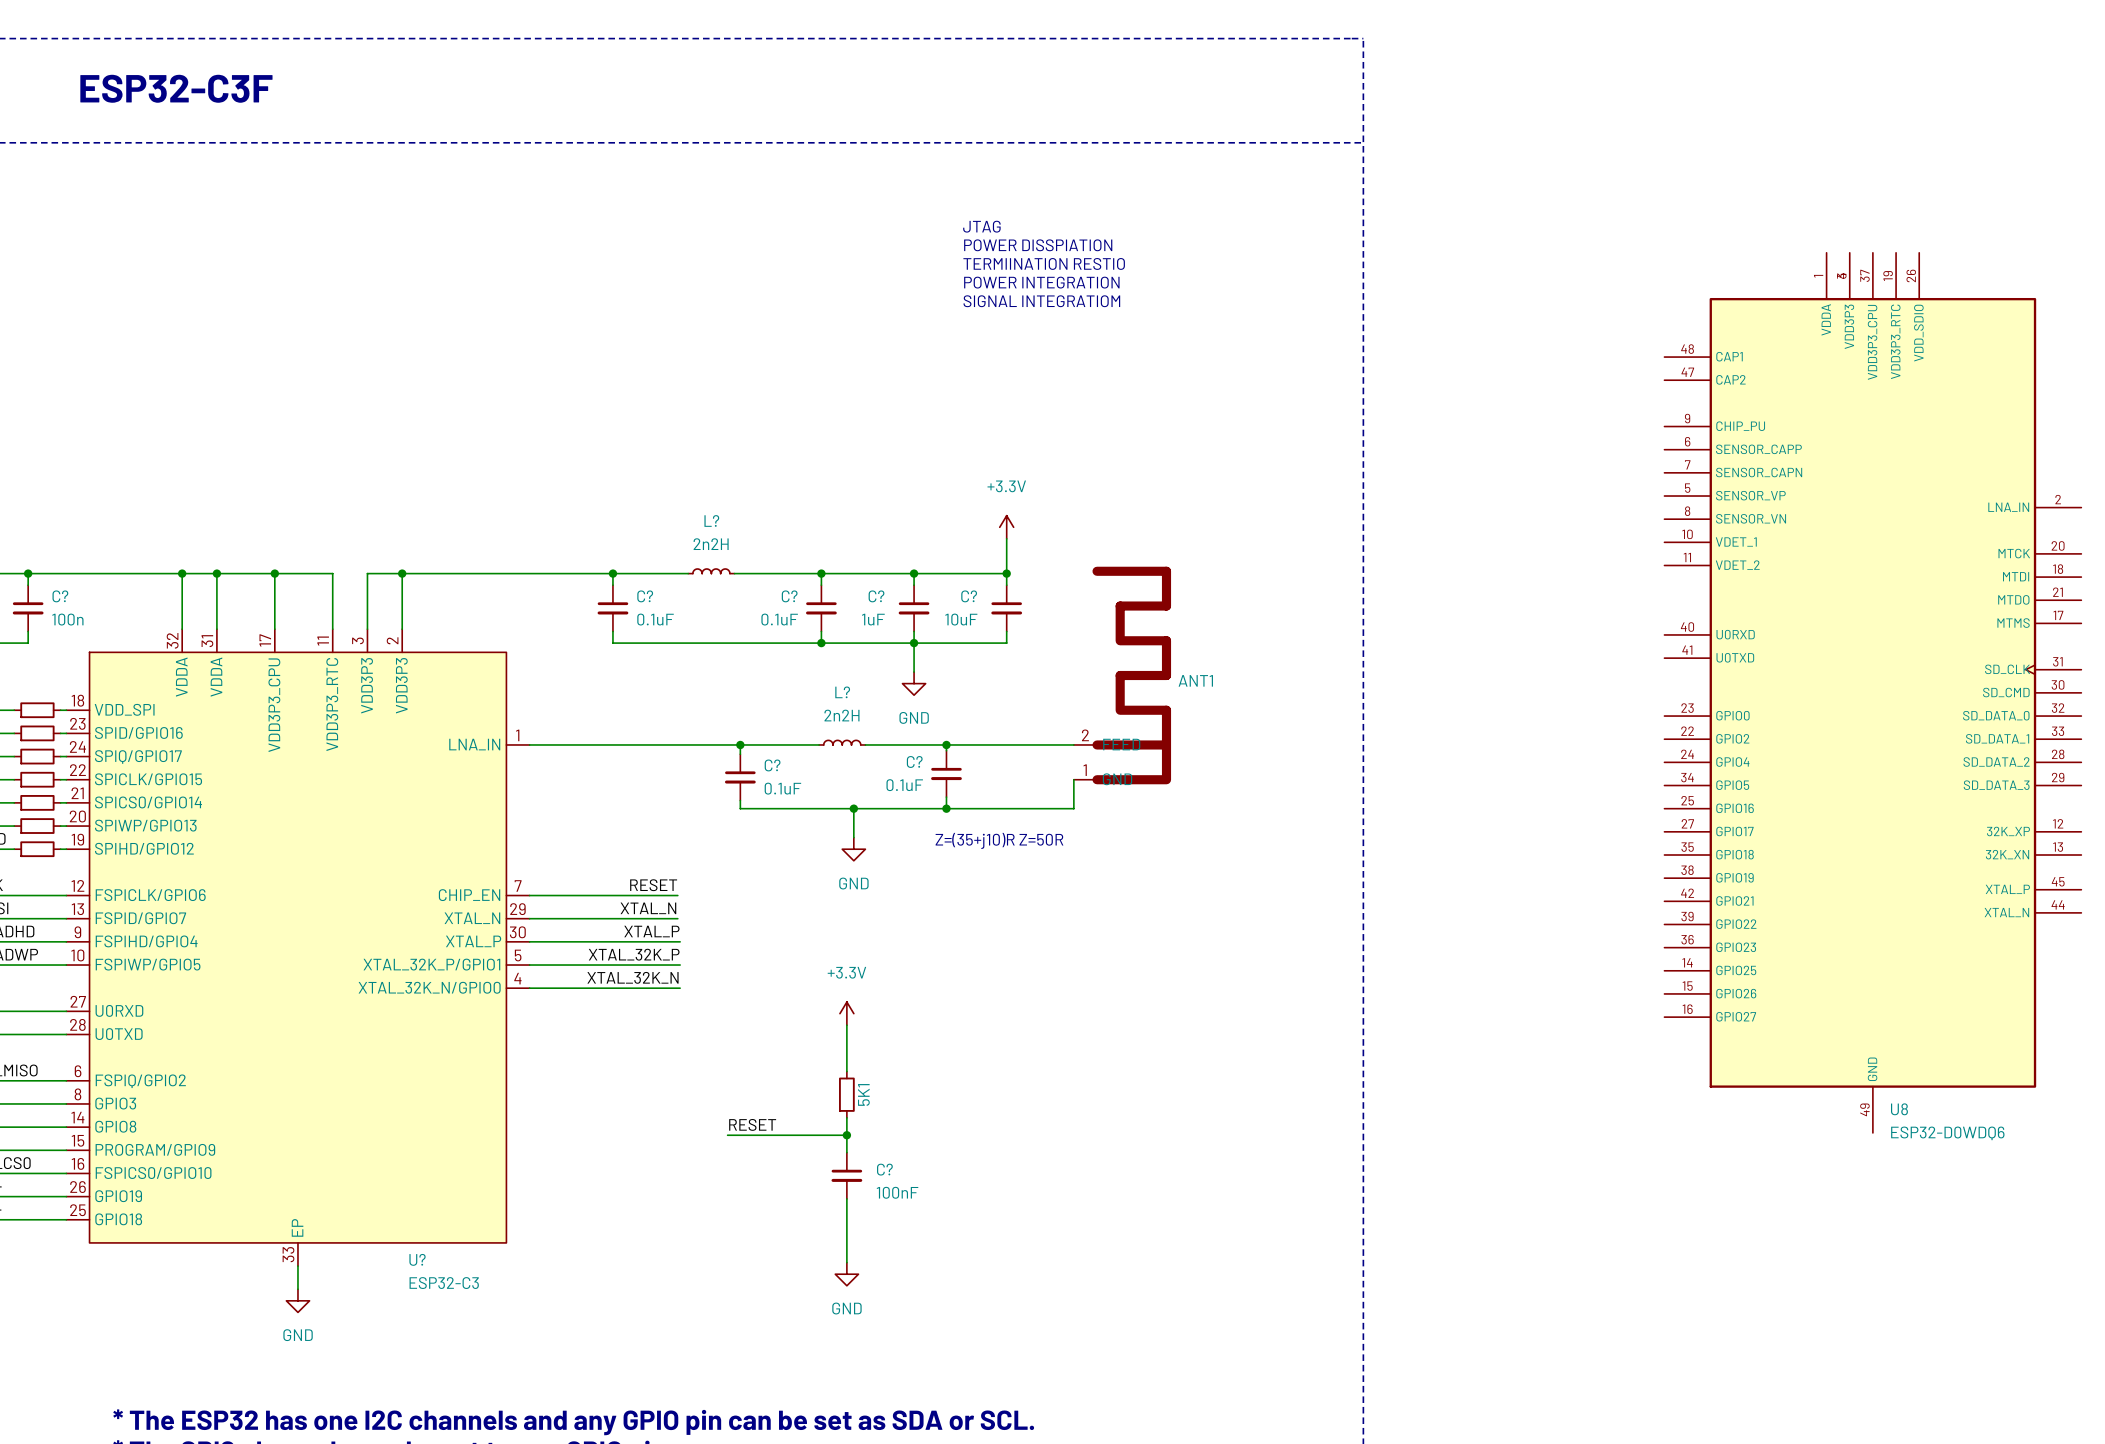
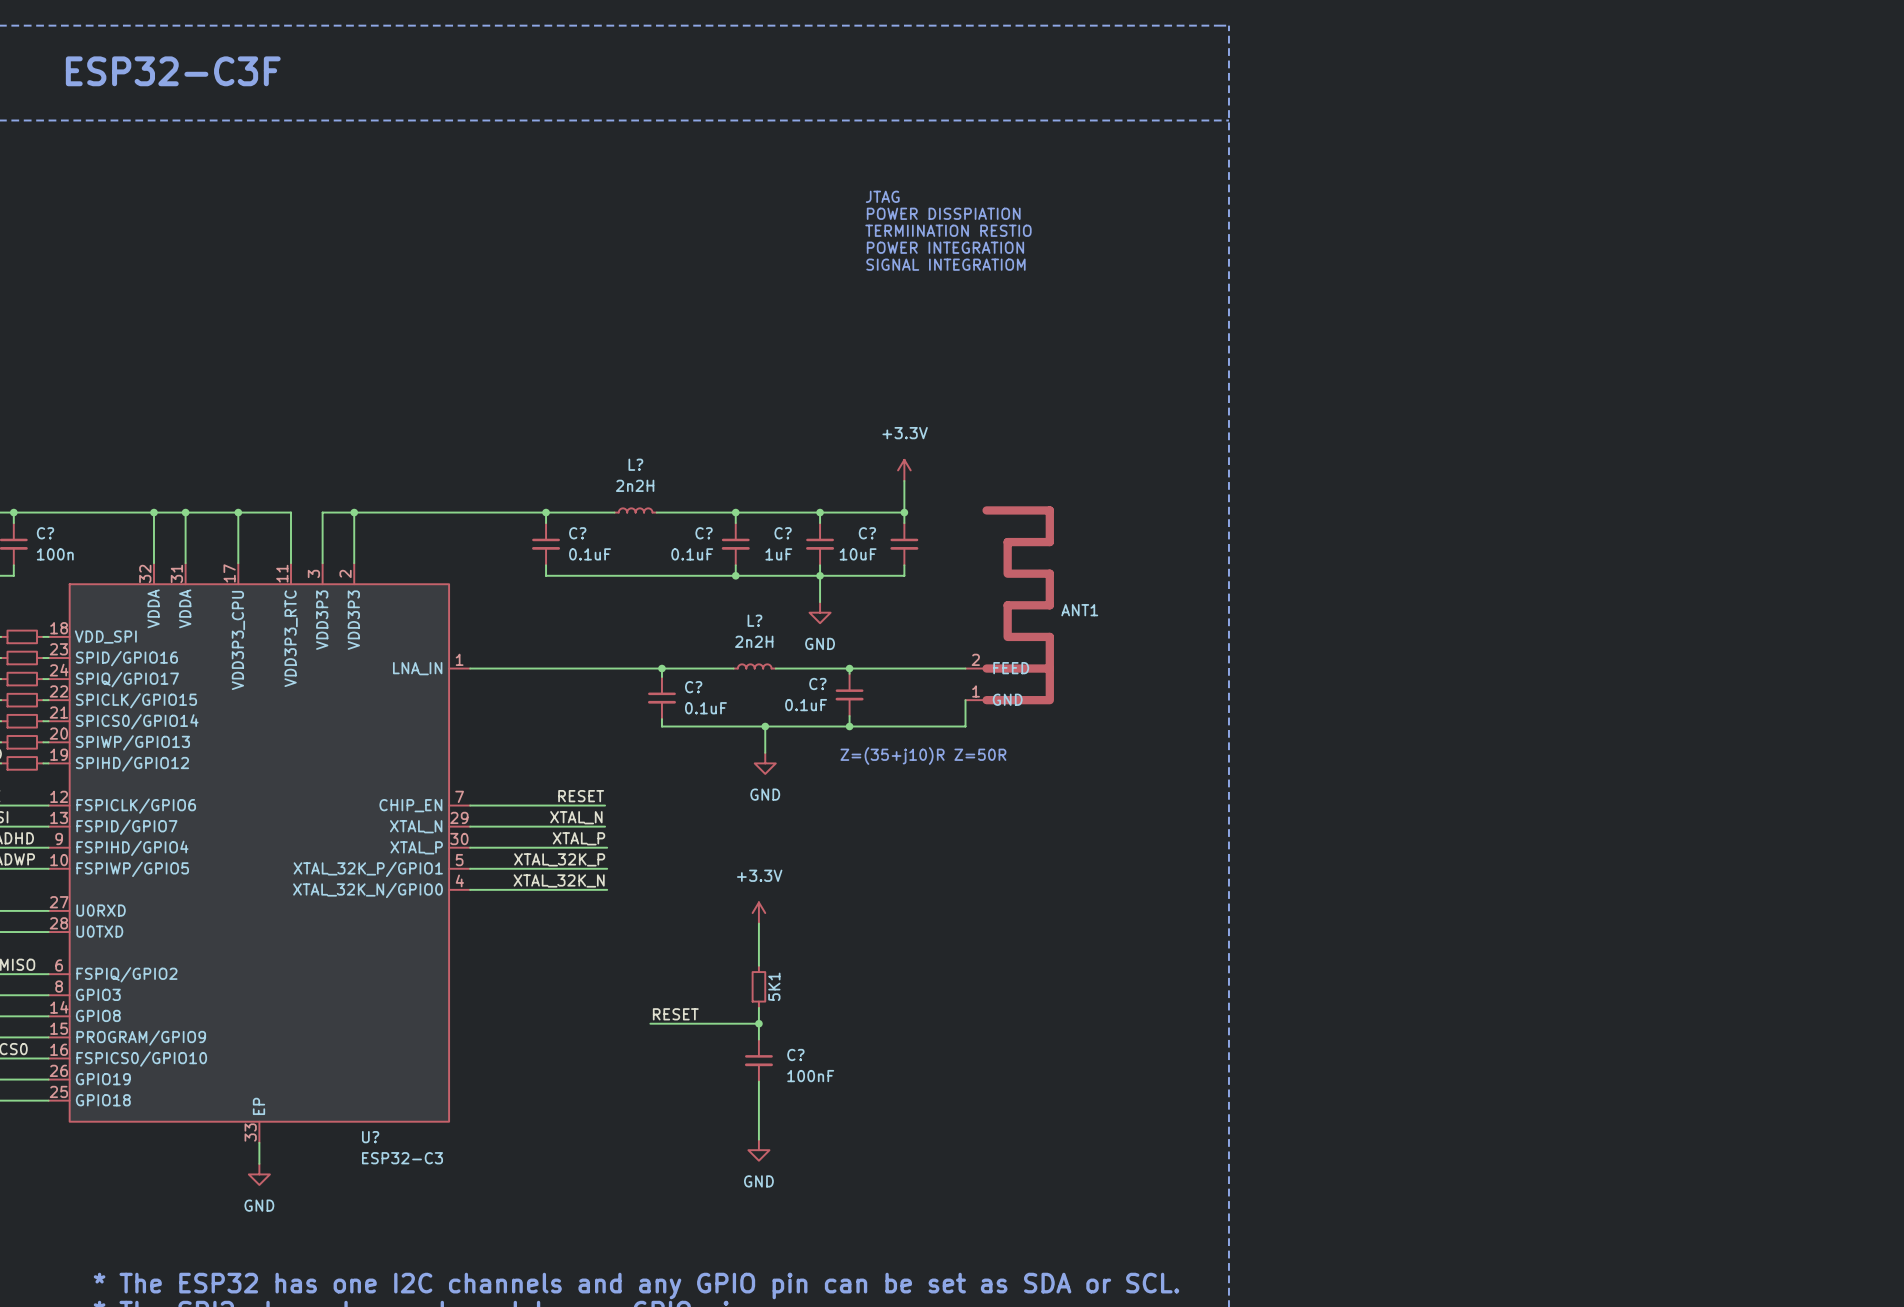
U8: ESP32-D0WDQ6 (1872, 692) -> none

